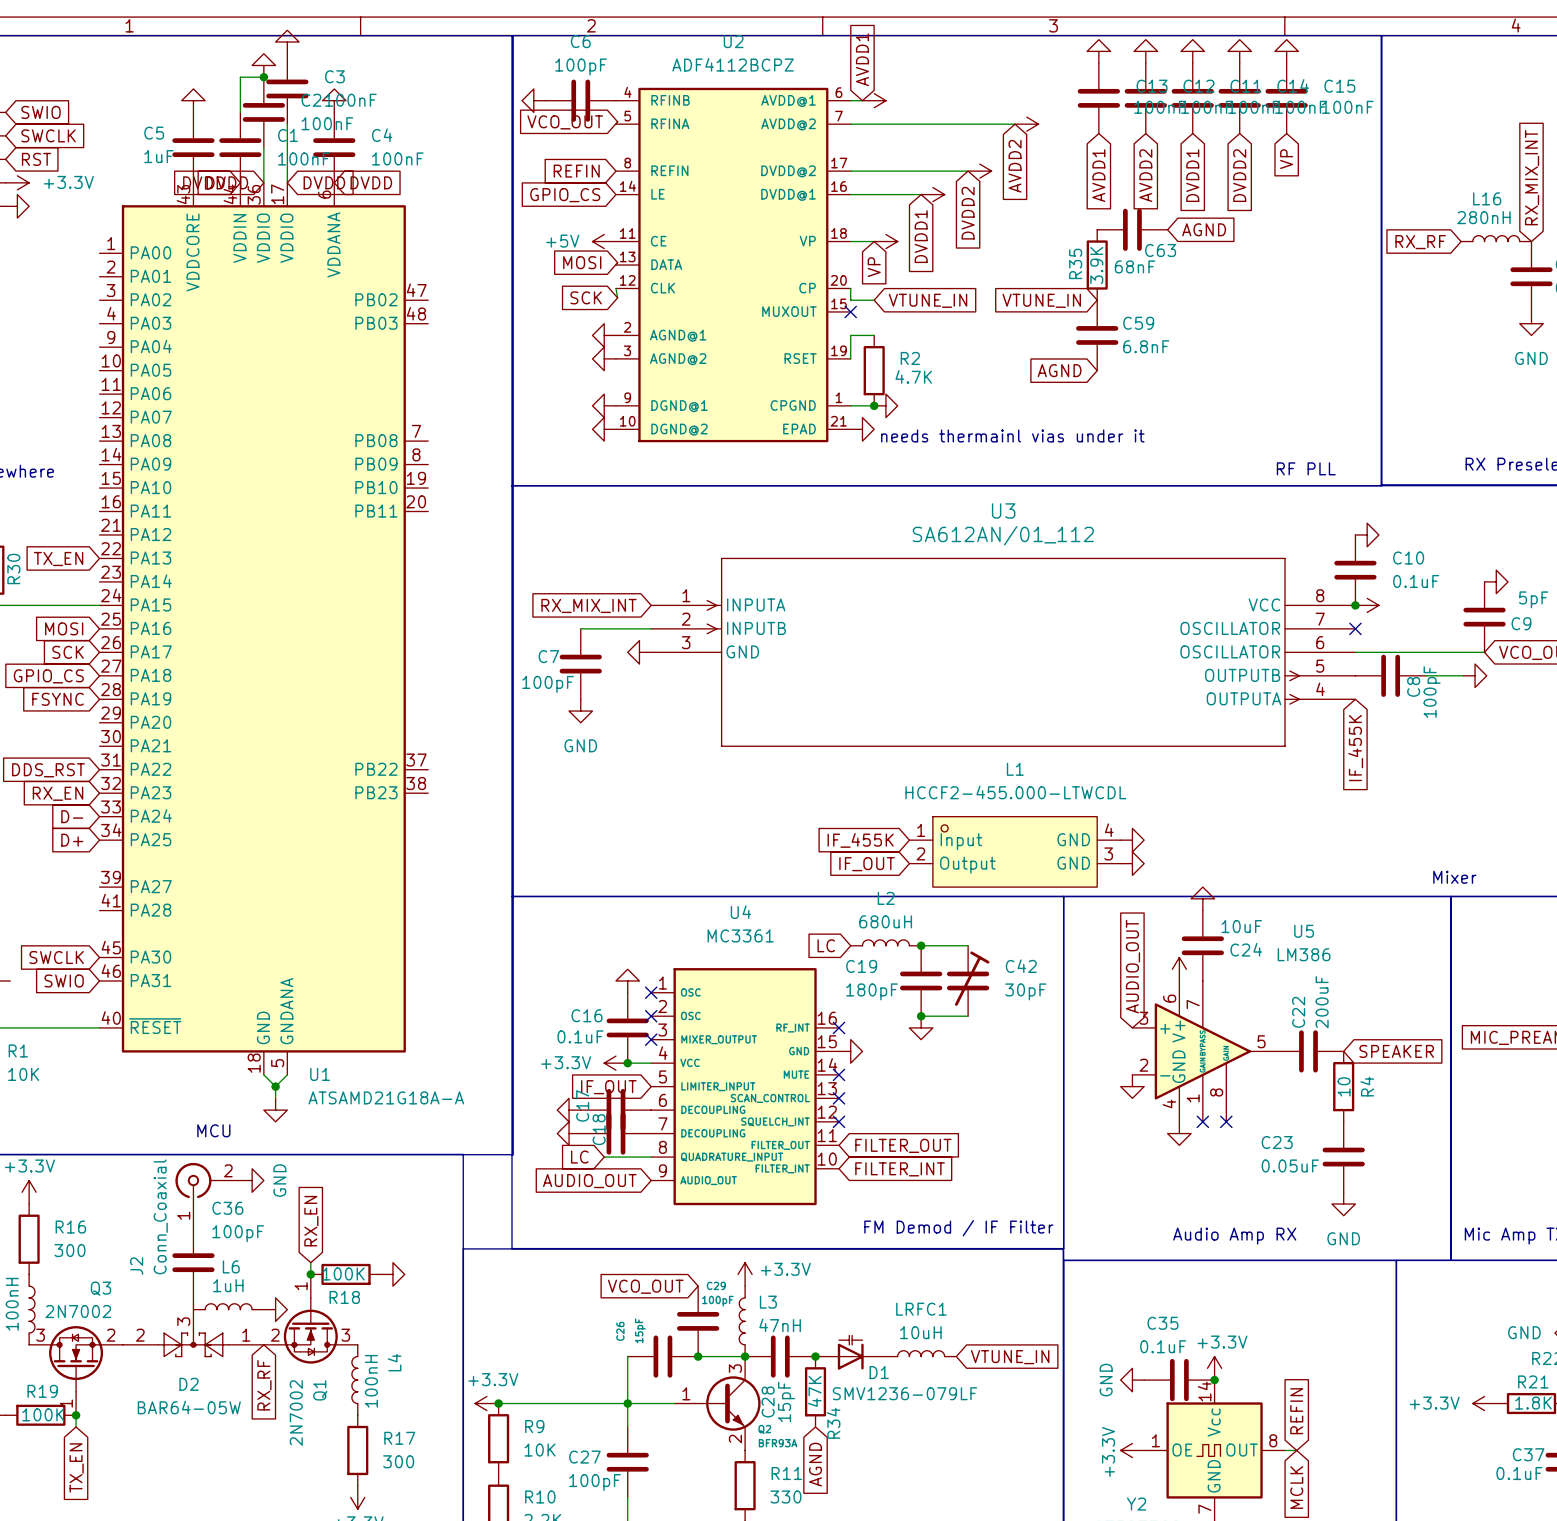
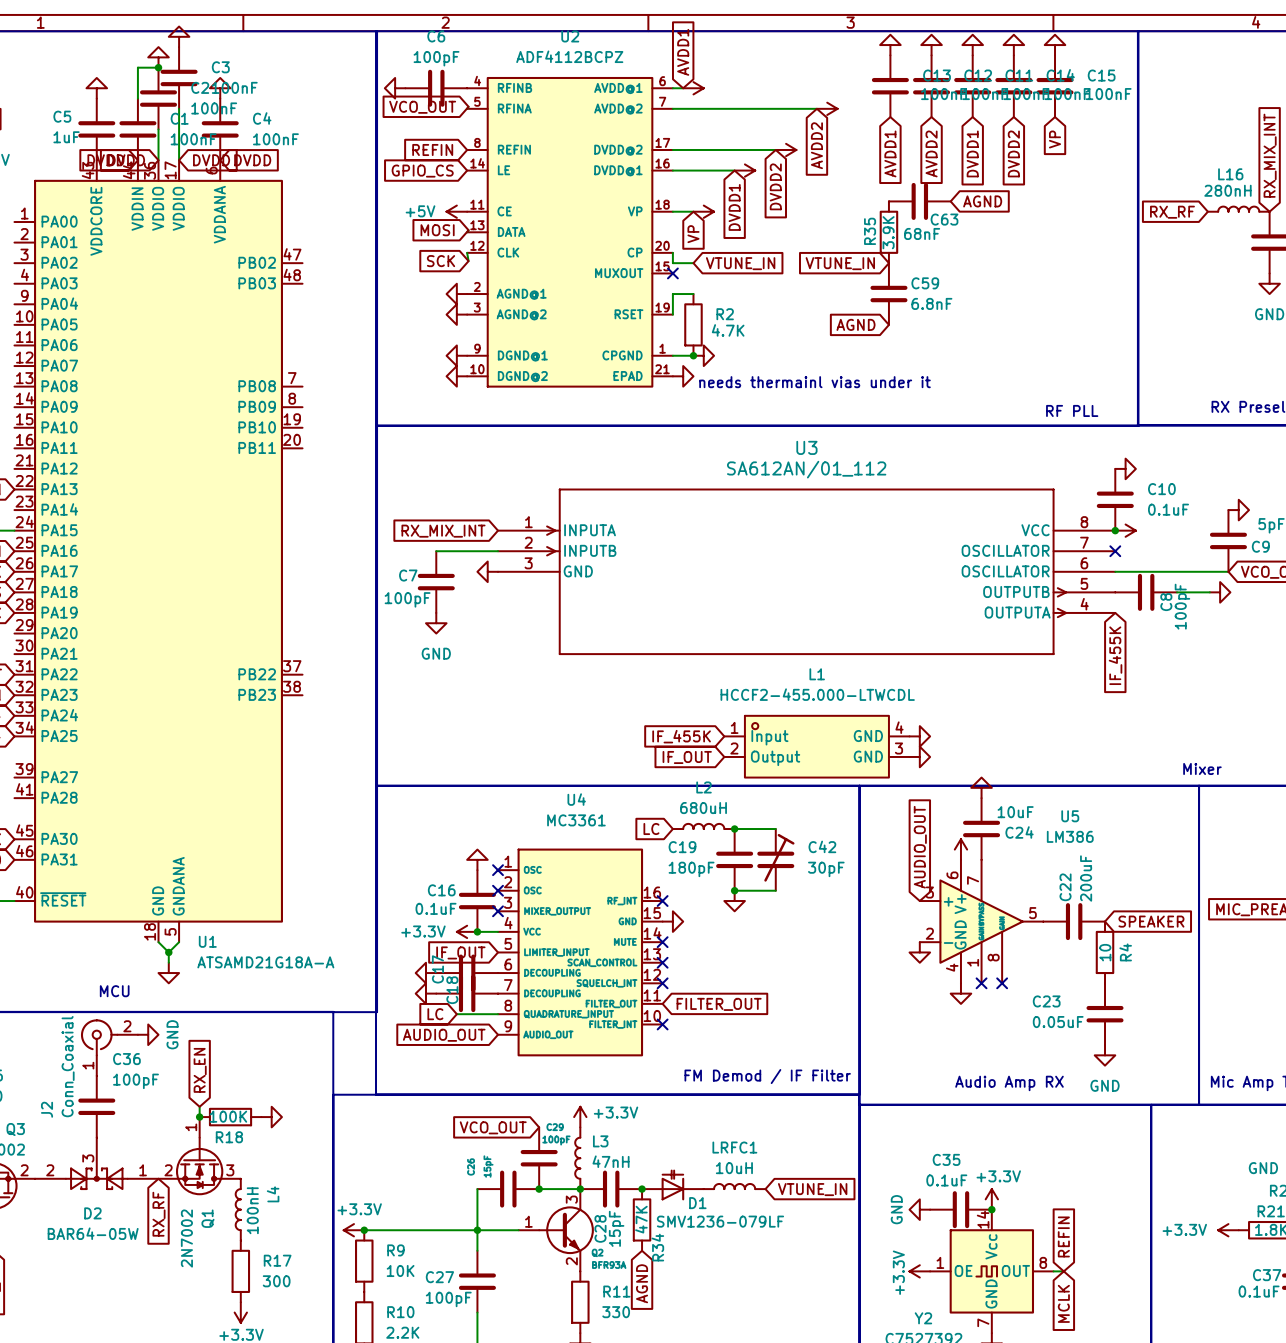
no-connect mark: none -> (662, 1024)
global label: FILTER_INT (900, 1169) -> none
L6: 1uH (228, 1306) -> none
power symbol: (275, 1309) -> none

